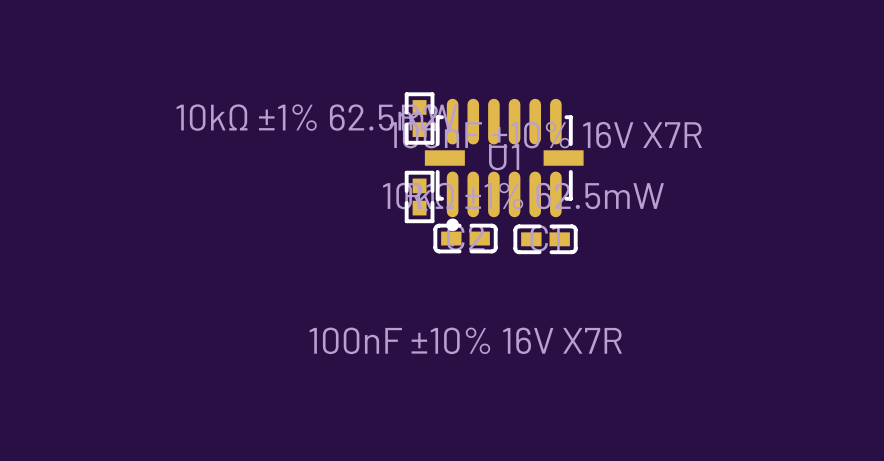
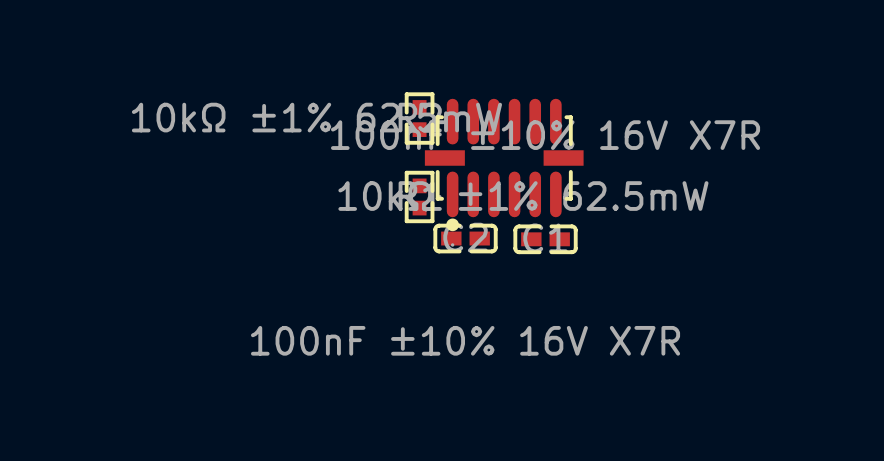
U1 name: U1 (504, 157) -> none

